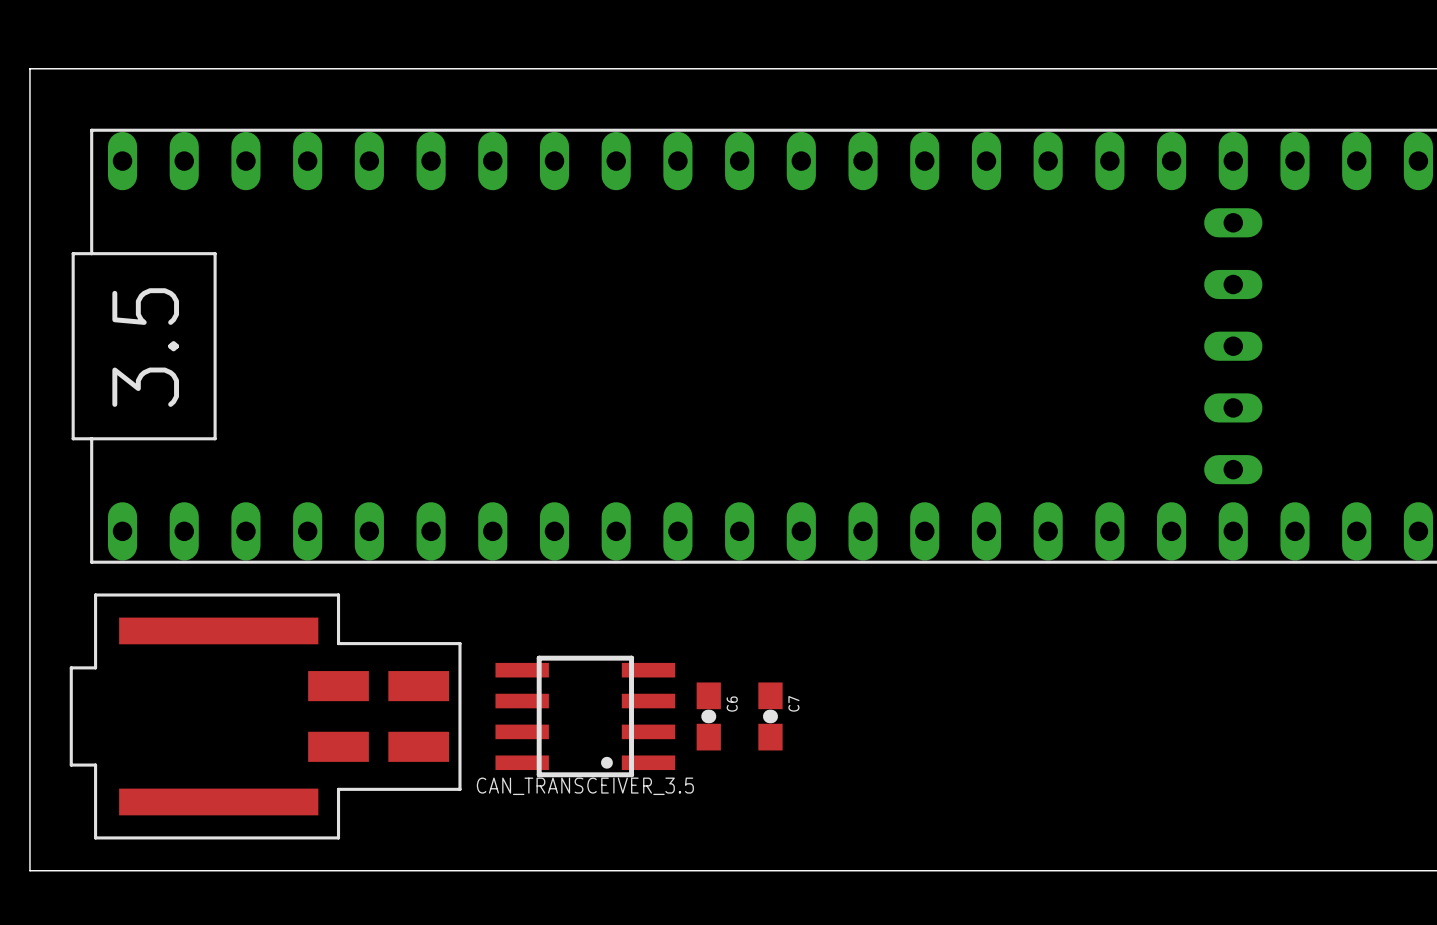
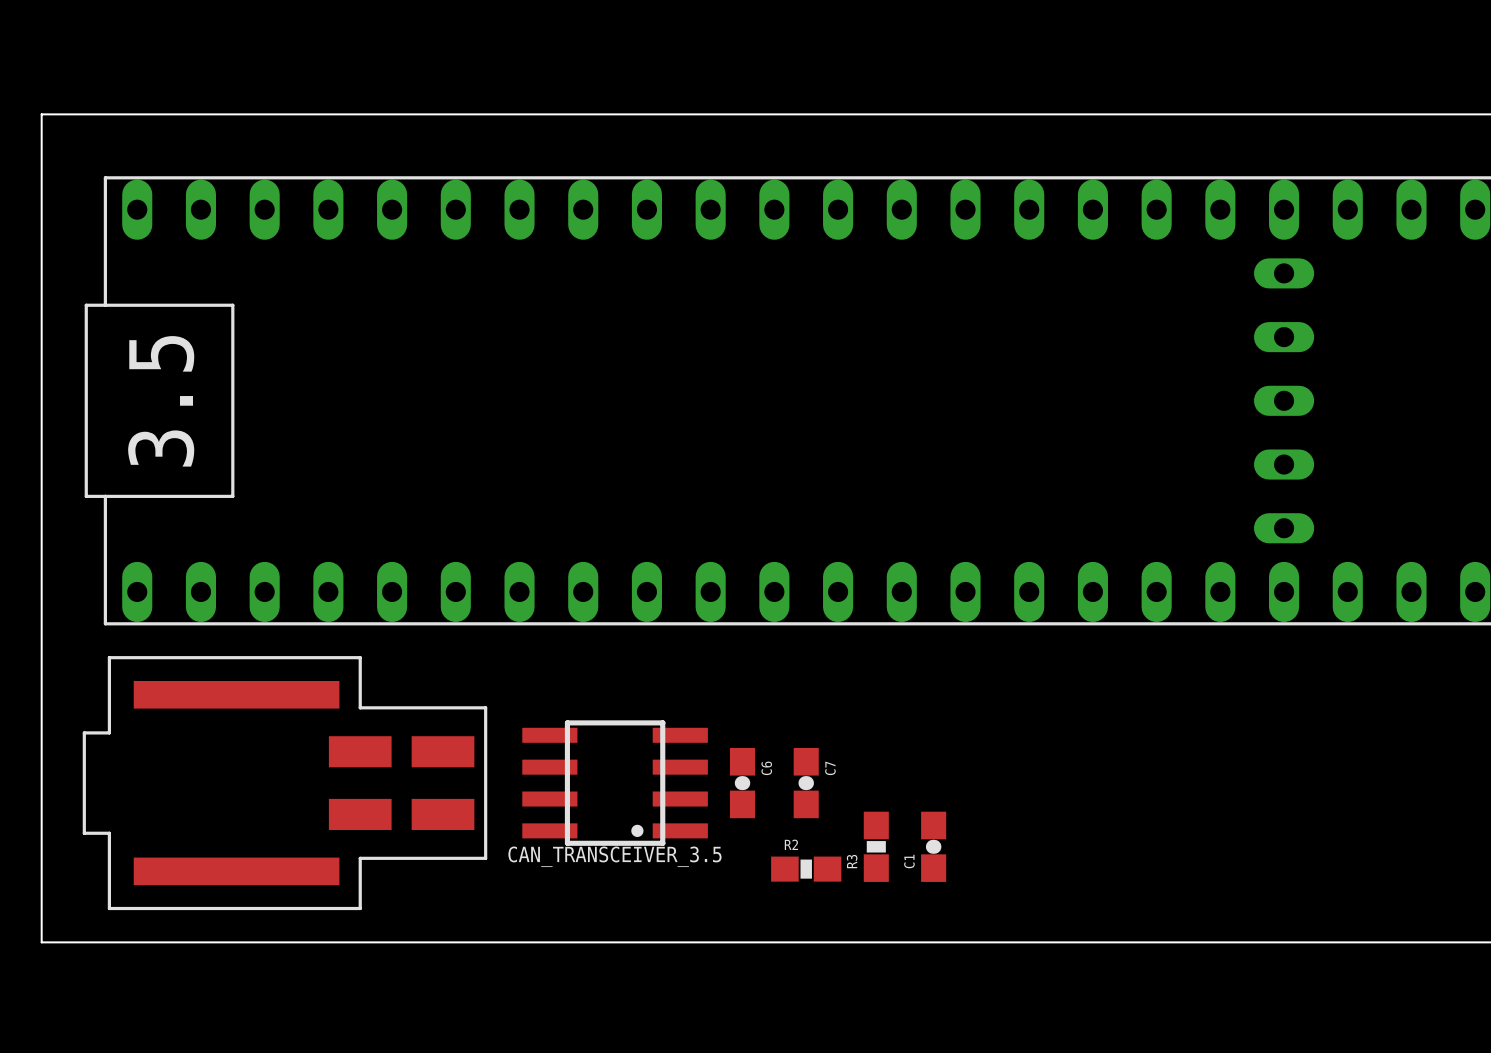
R3: none -> (876, 846)
C1: none -> (933, 846)
R2: none -> (806, 869)

